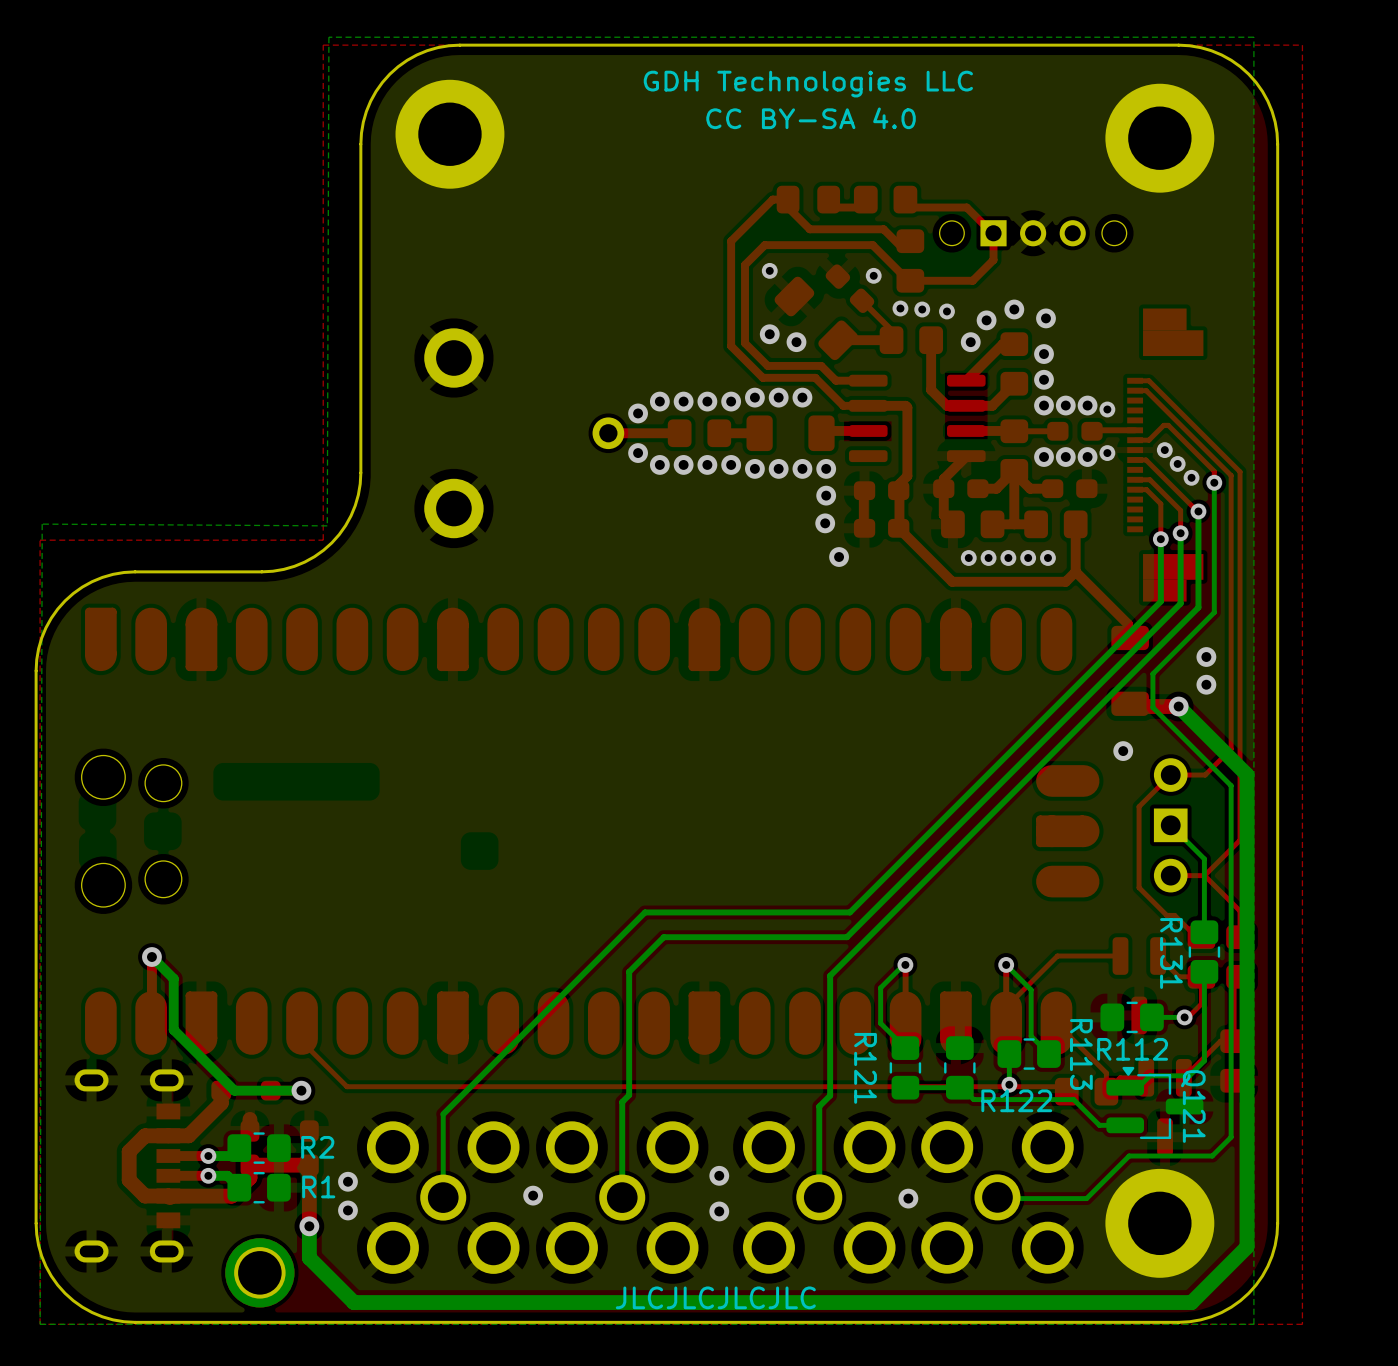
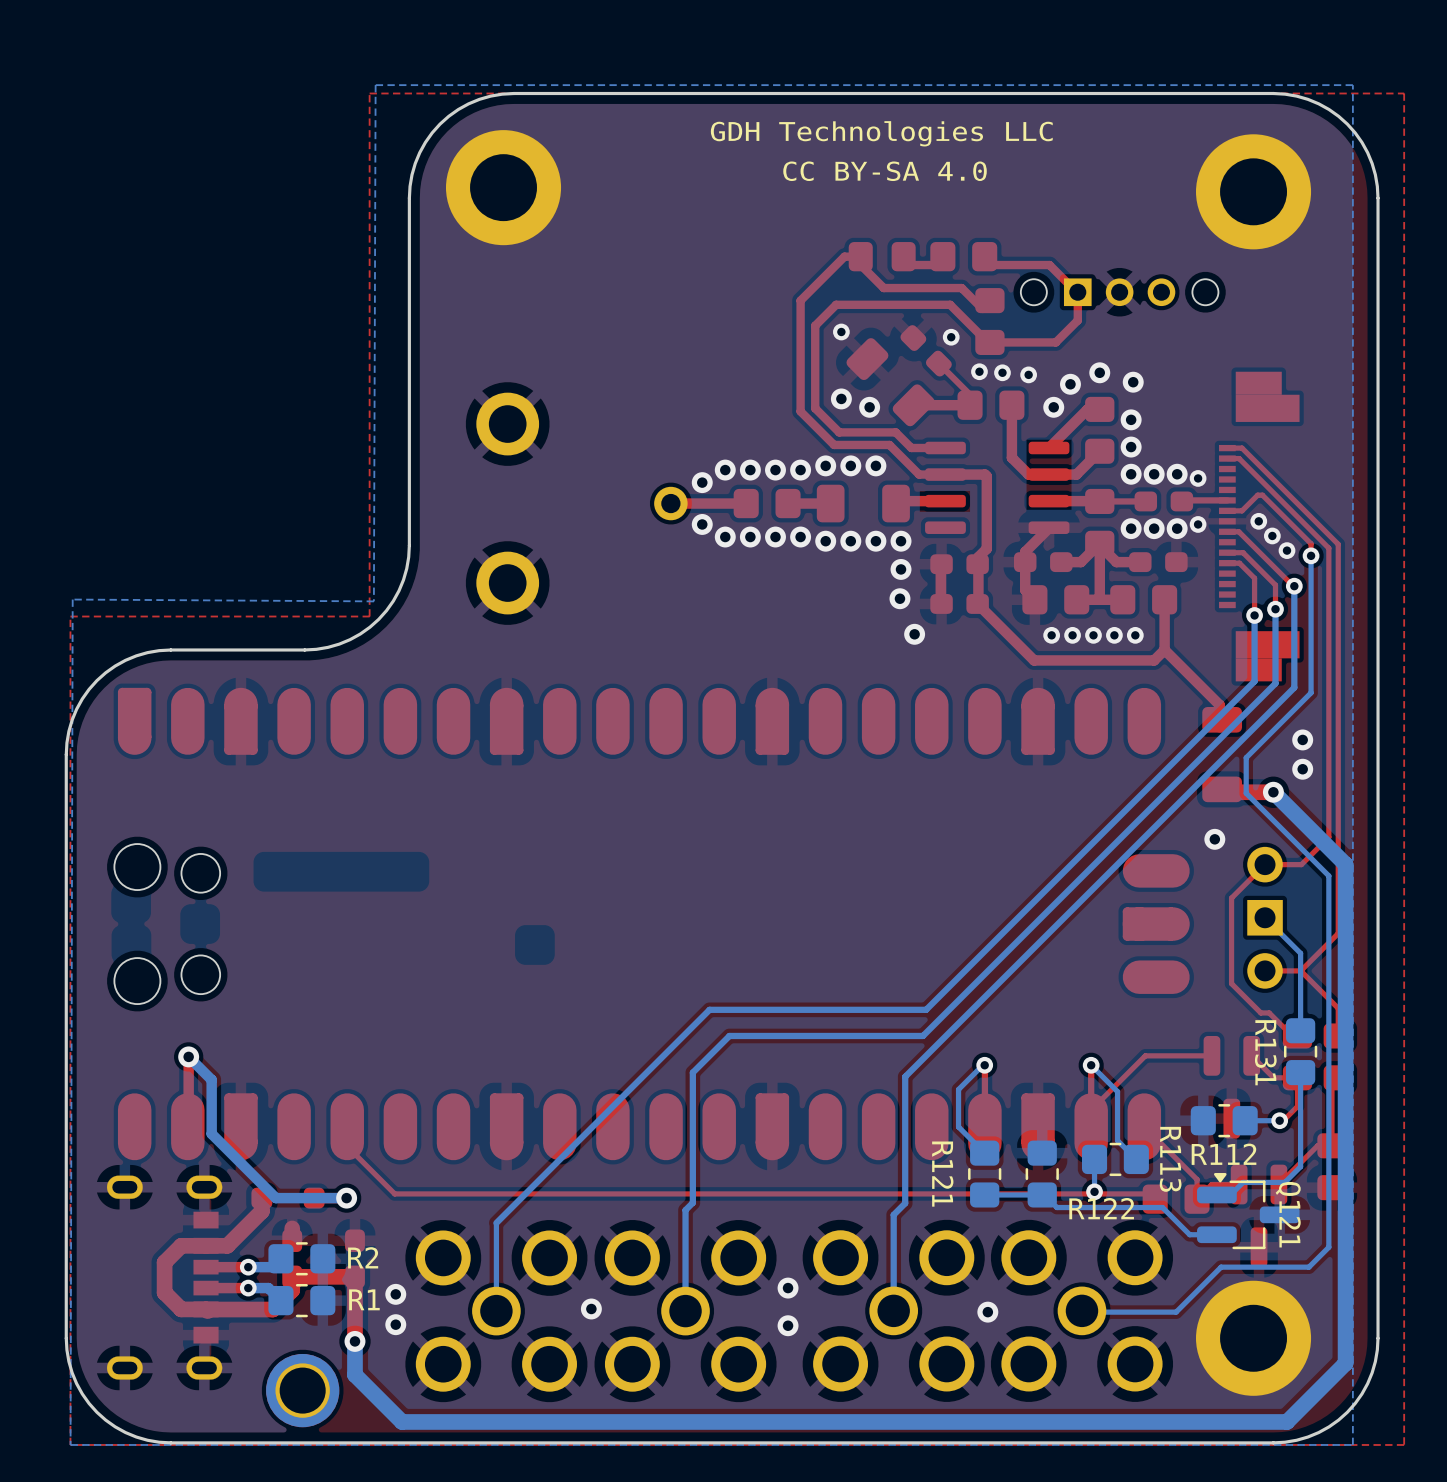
text: JLCJLCJLCJLC (715, 1297) -> none

